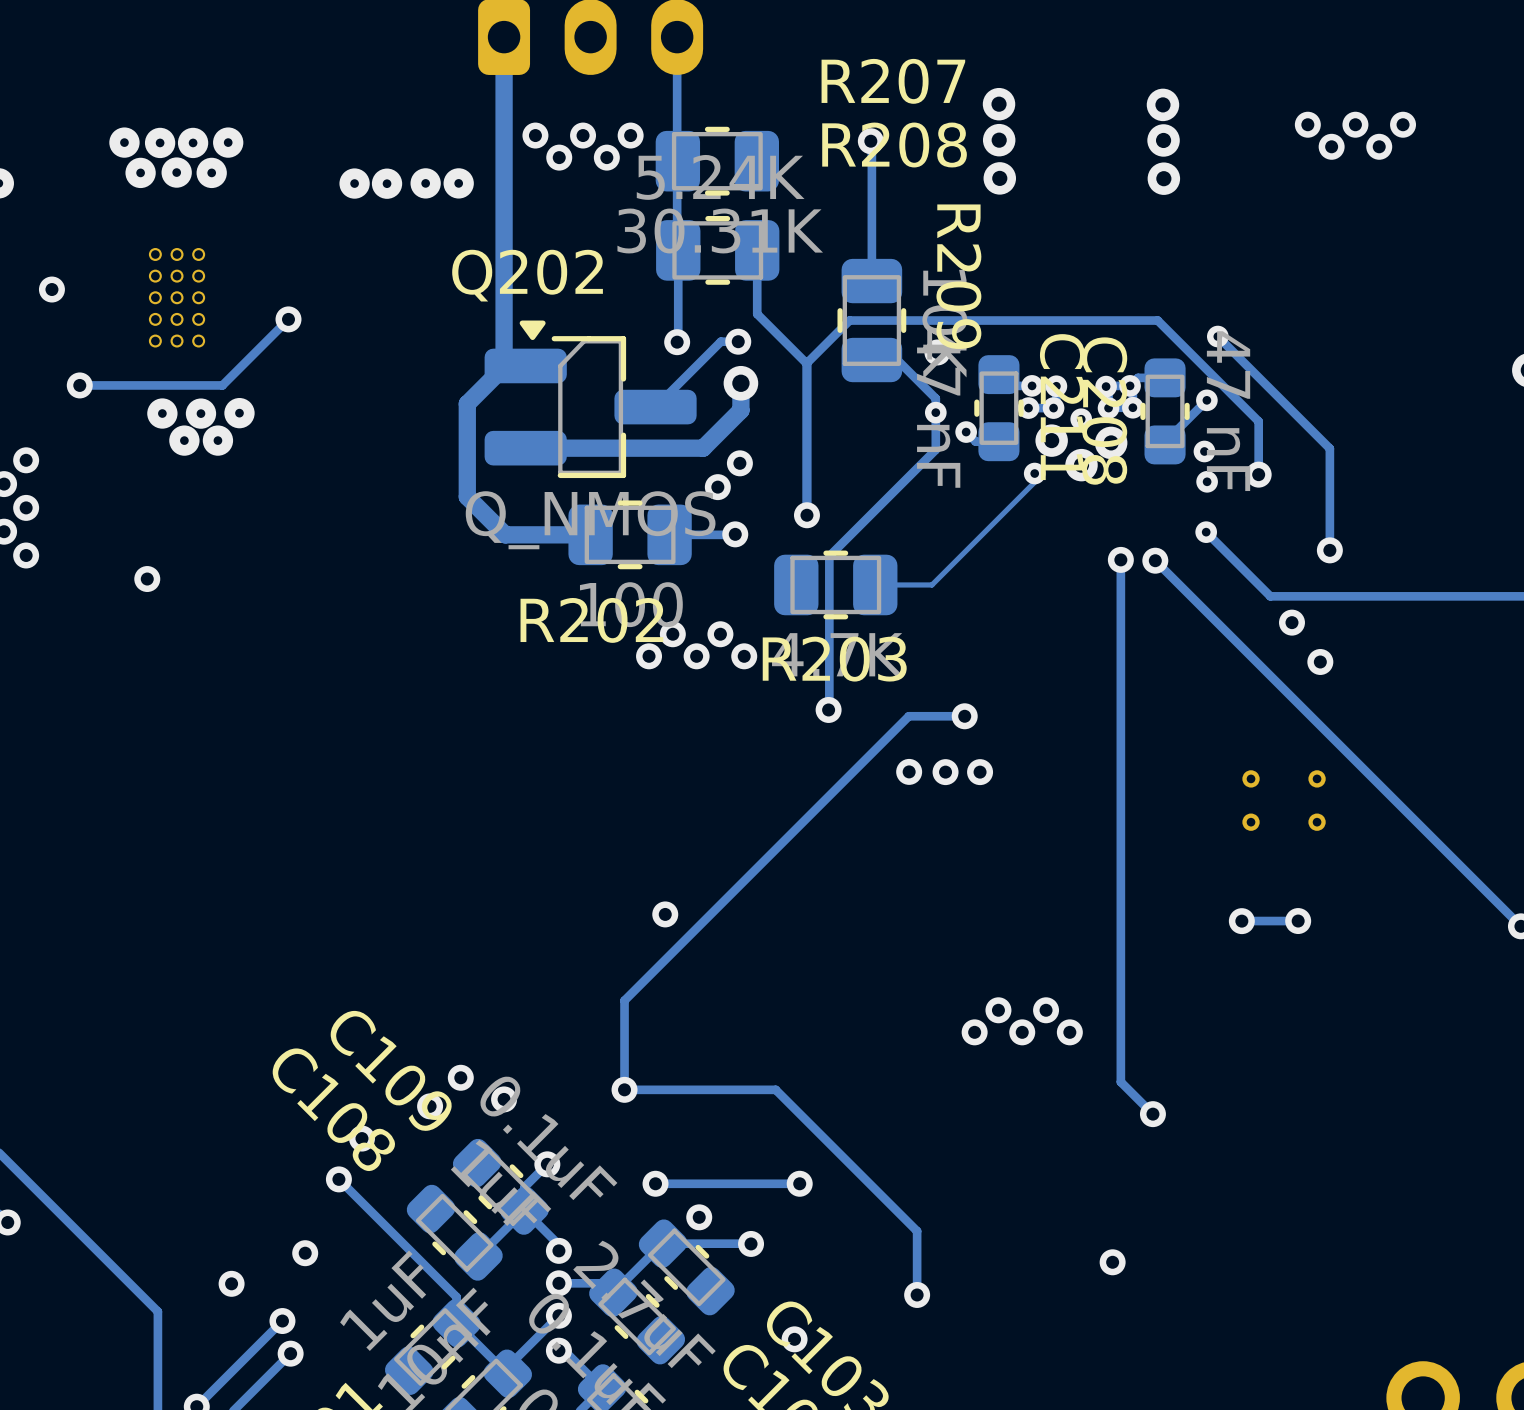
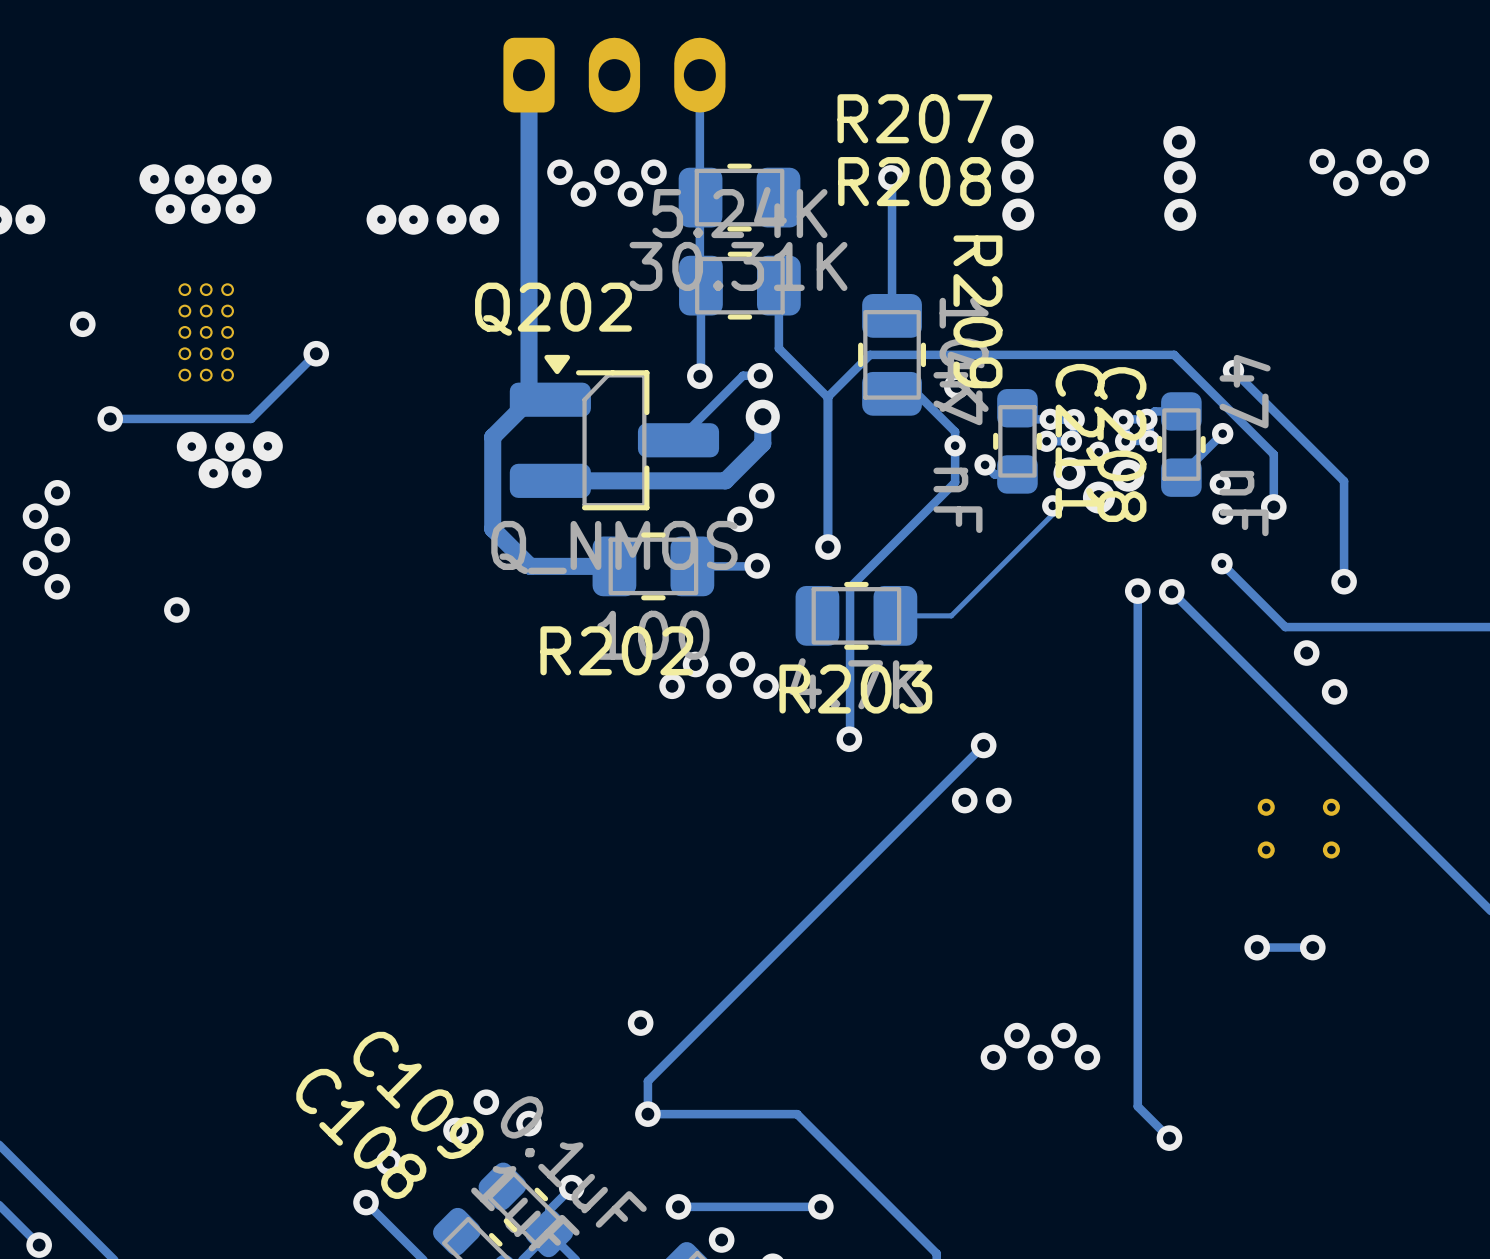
track: (964, 716) (908, 716) (624, 1000) (624, 1056) -> (983, 745) (647, 1081)
via: (909, 771) -> none
via: (665, 914) -> none
via: none -> (640, 1023)

